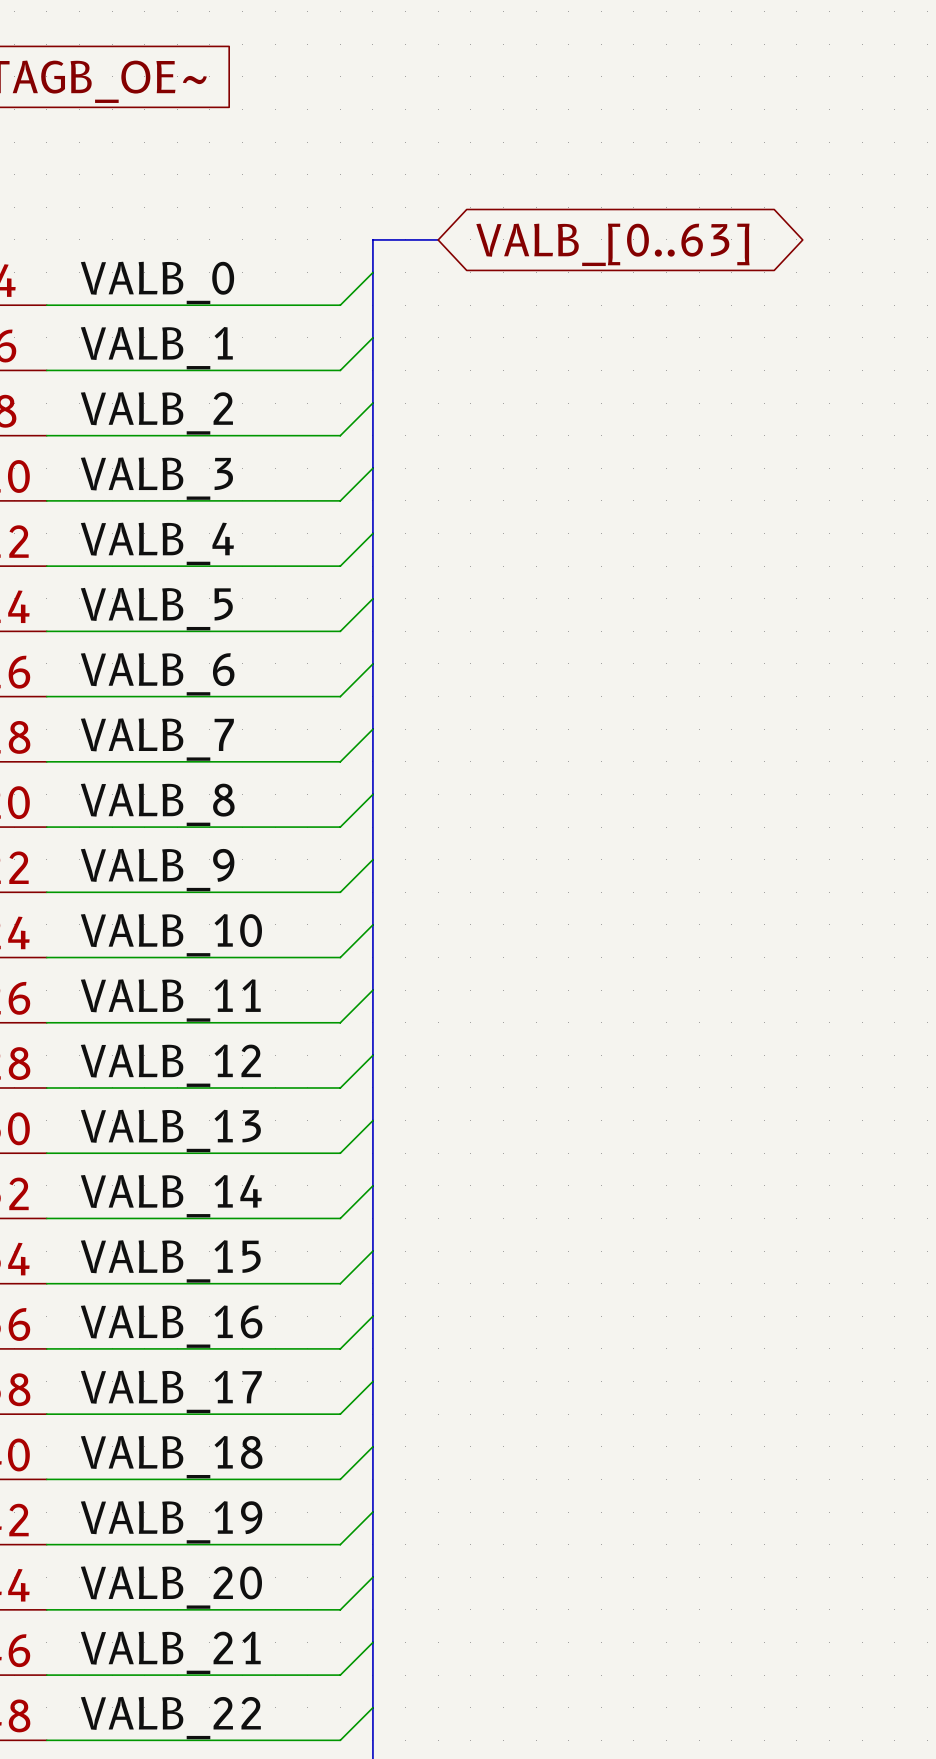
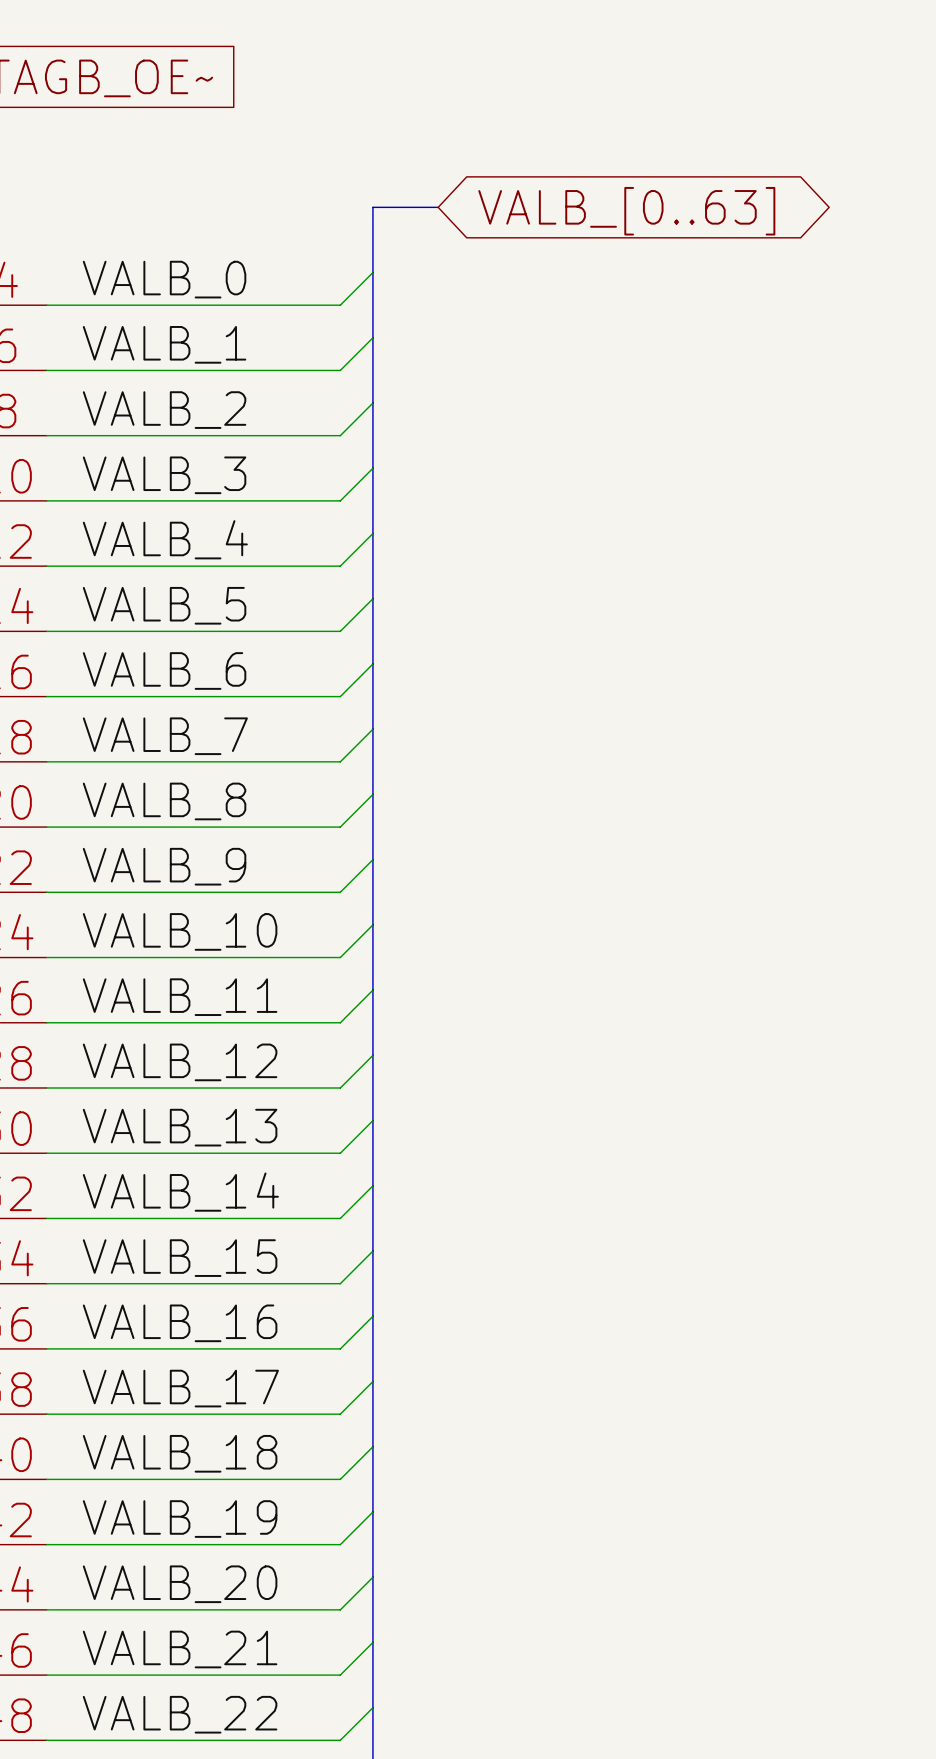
bus: (372, 239) (438, 239) -> (372, 239) (372, 207) (438, 207)
global label position: VALB_[0..63] (612, 244) -> VALB_[0..63] (626, 211)

